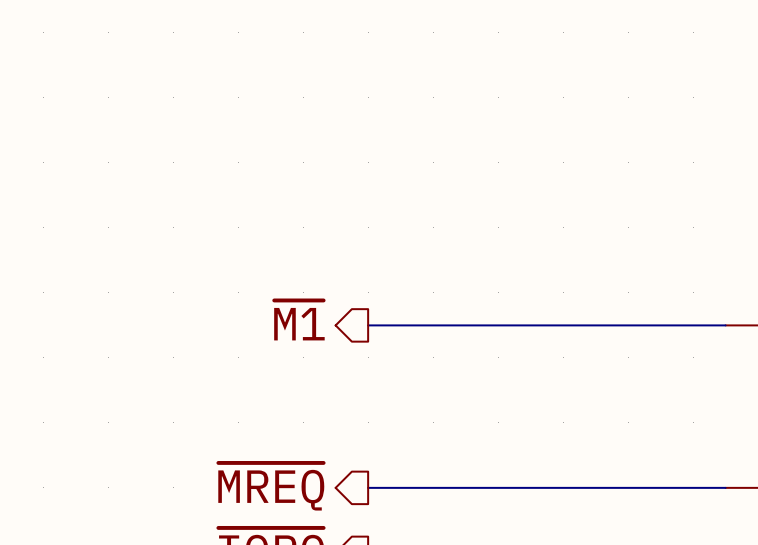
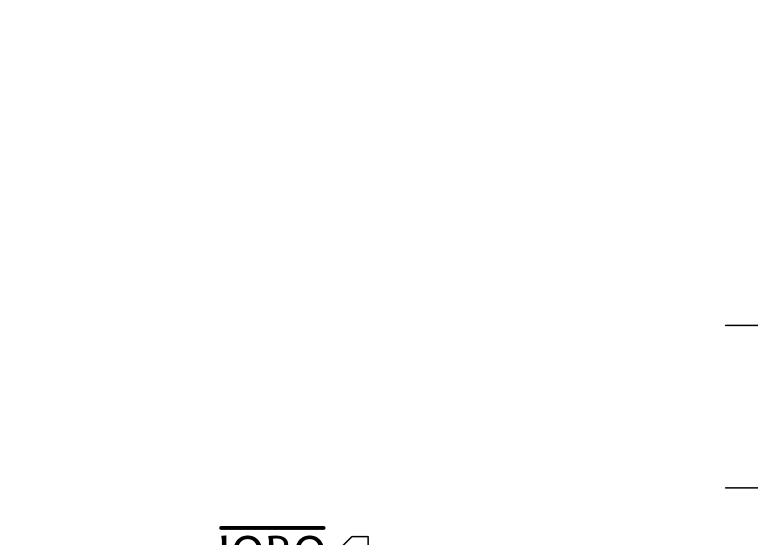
hierarchical label: ~{M1} (299, 320) -> none
wire: (368, 325) (725, 325) -> none
hierarchical label: ~{MREQ} (271, 486) -> none
wire: (368, 487) (725, 487) -> none

